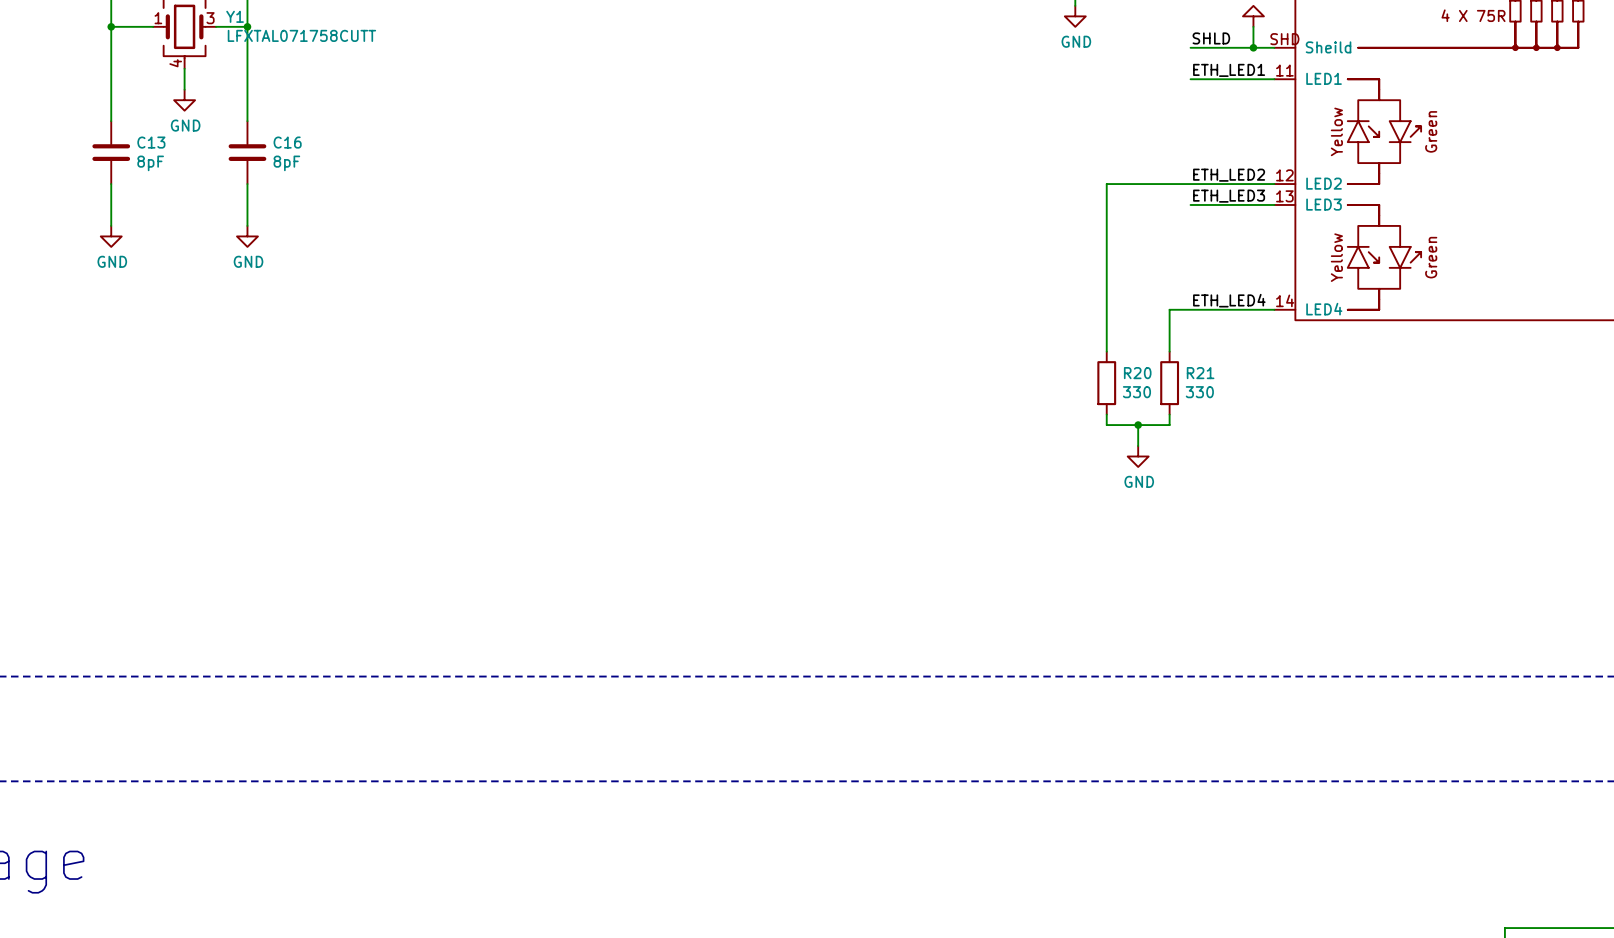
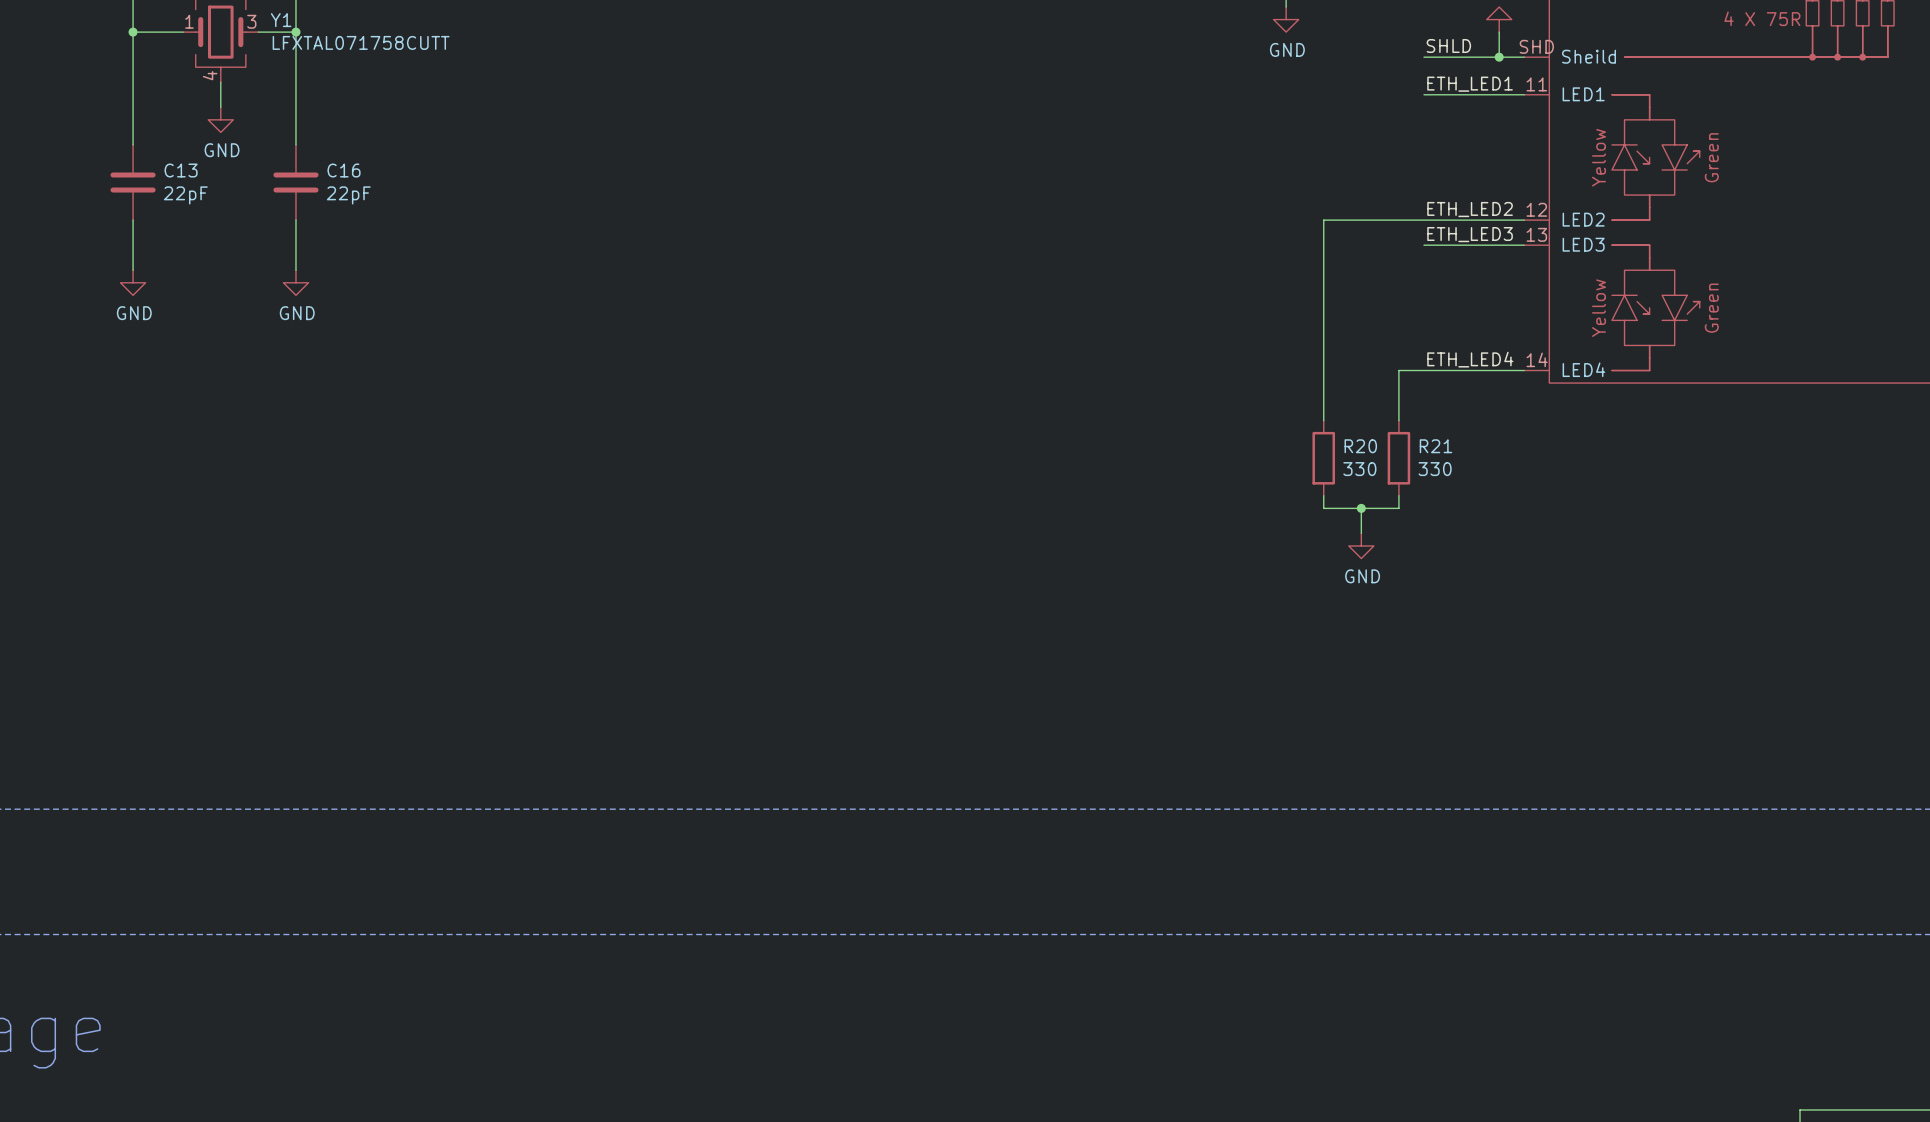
C13 value: 8pF (150, 163) -> 22pF (185, 195)
C16 value: 8pF (286, 163) -> 22pF (348, 195)

